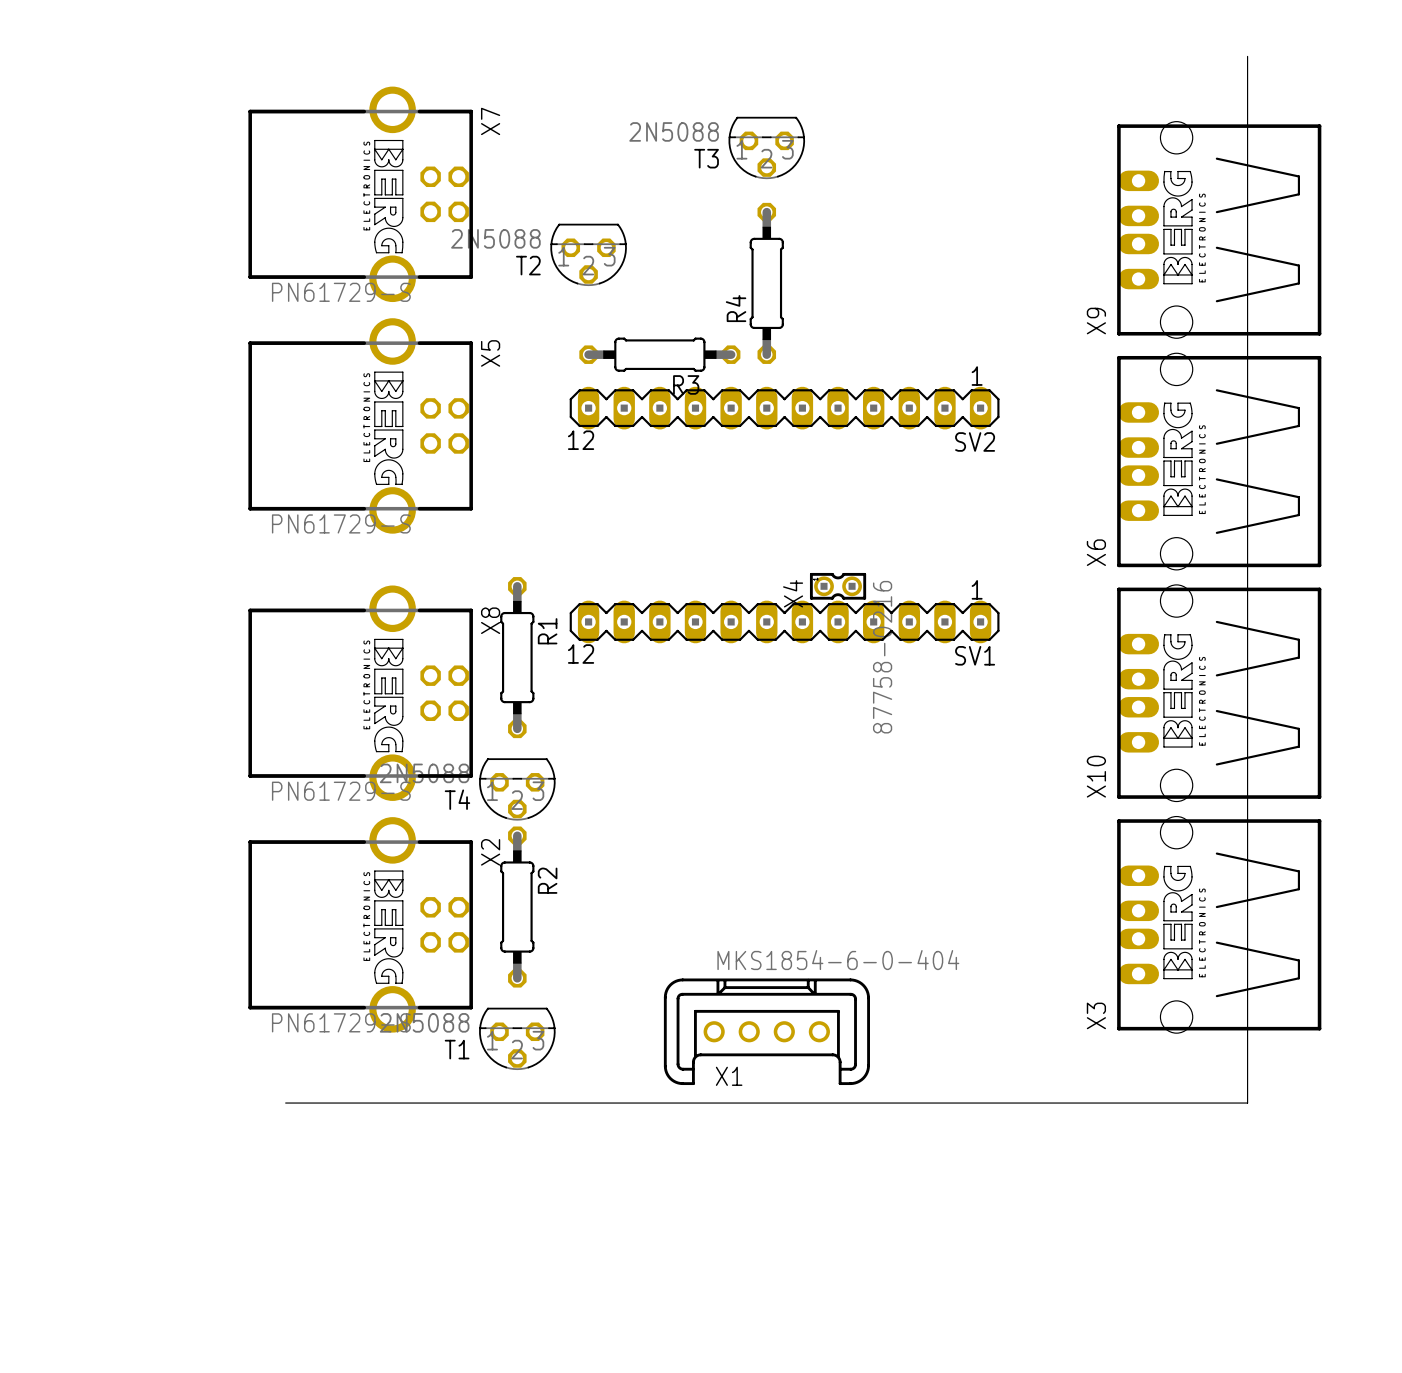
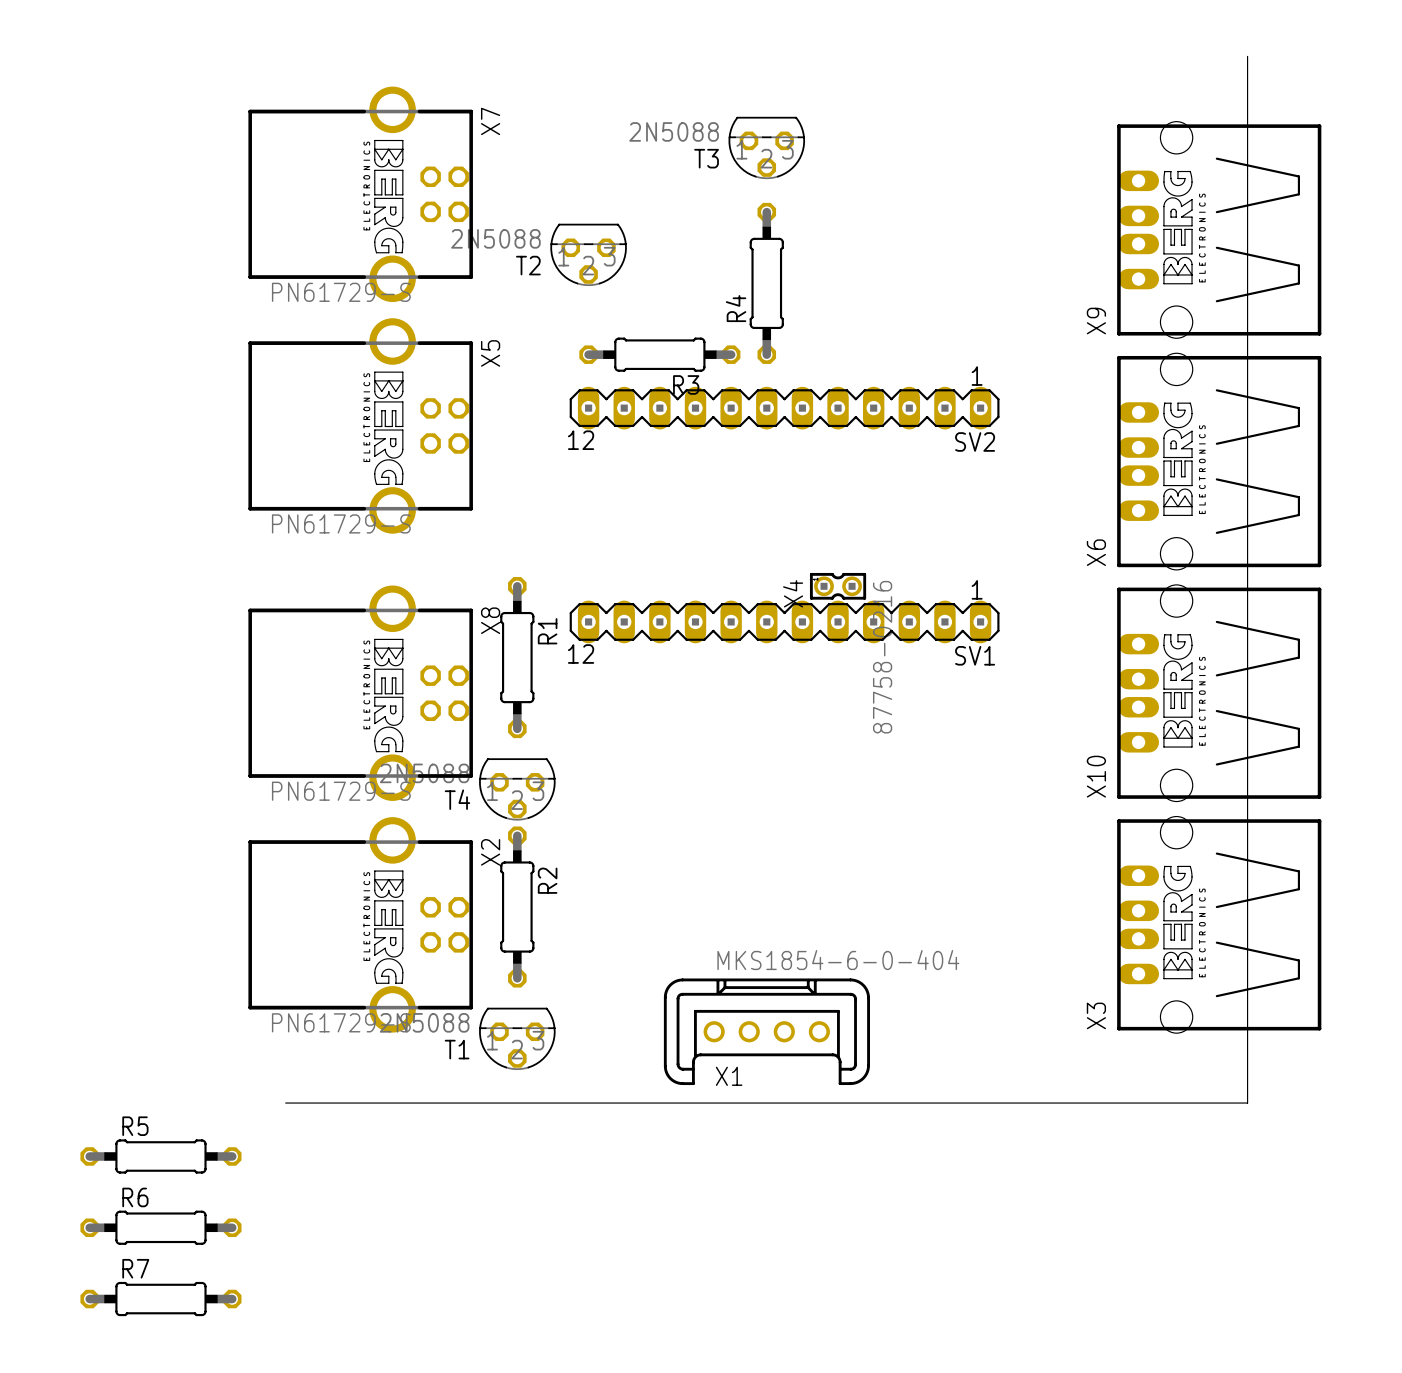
R5: none -> (160, 1156)
R6: none -> (160, 1227)
R7: none -> (160, 1299)

